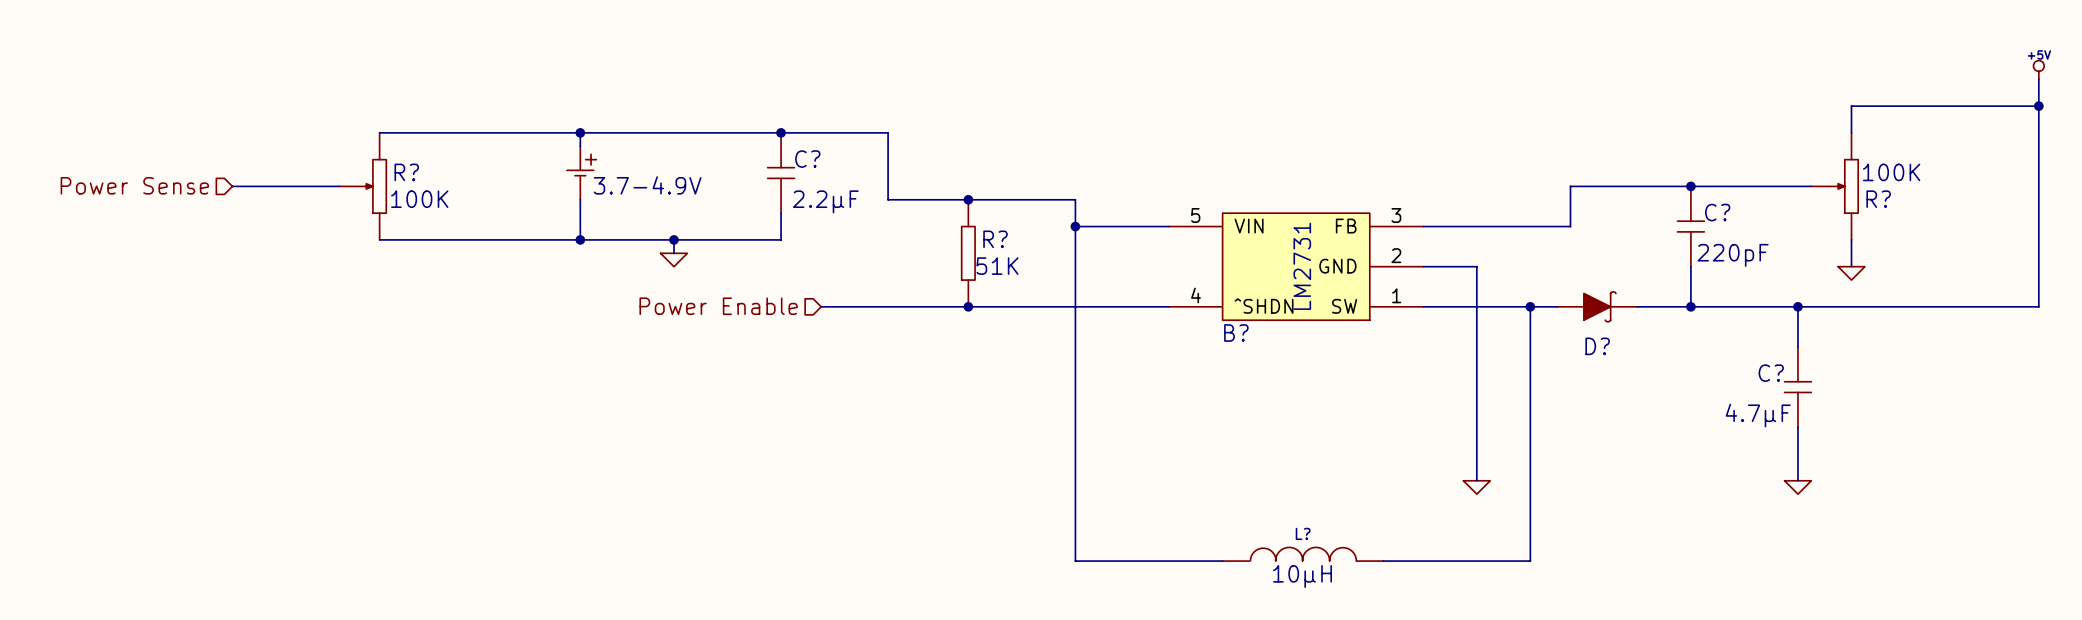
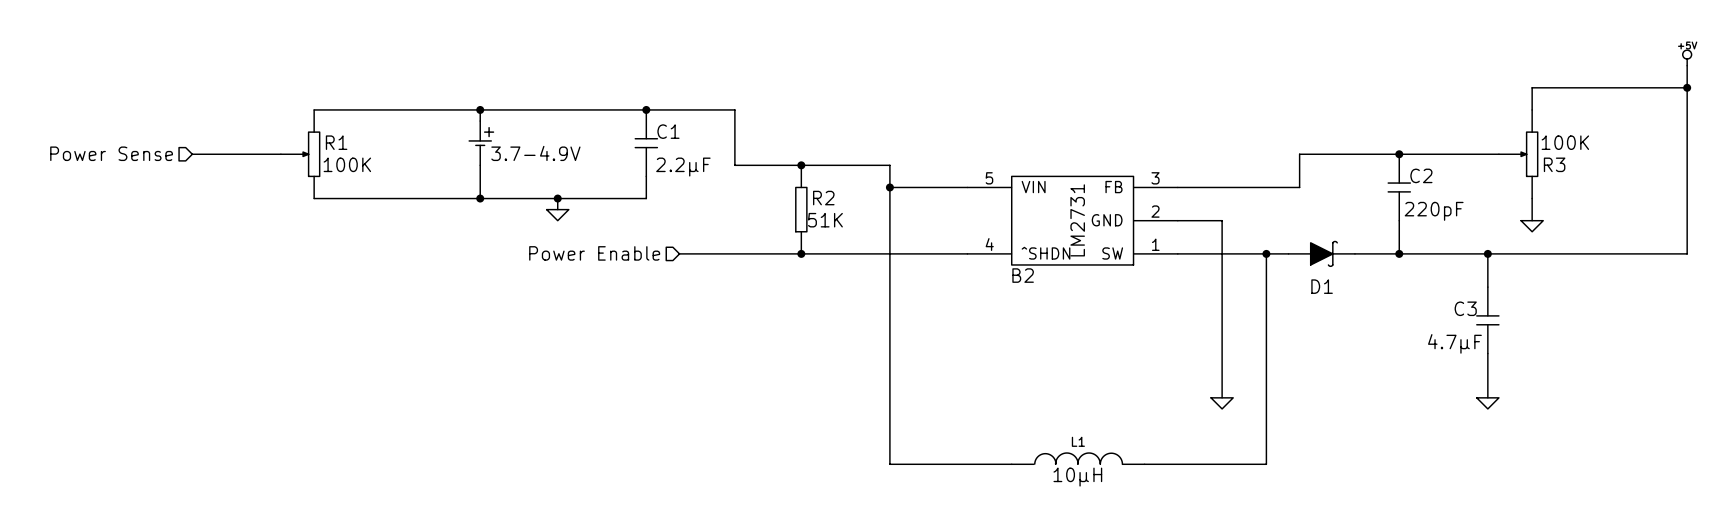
C? name: C? (807, 159) -> C1 (668, 131)
R? name: R? (406, 172) -> R1 (336, 142)
R? name: R? (1878, 199) -> R3 (1554, 164)
C? name: C? (1717, 212) -> C2 (1421, 175)
R? name: R? (995, 239) -> R2 (823, 198)
B? name: B? (1236, 332) -> B2 (1023, 275)
D? name: D? (1597, 346) -> D1 (1322, 286)
C? name: C? (1771, 373) -> C3 (1465, 308)
L? name: L? (1303, 533) -> L1 (1078, 441)

